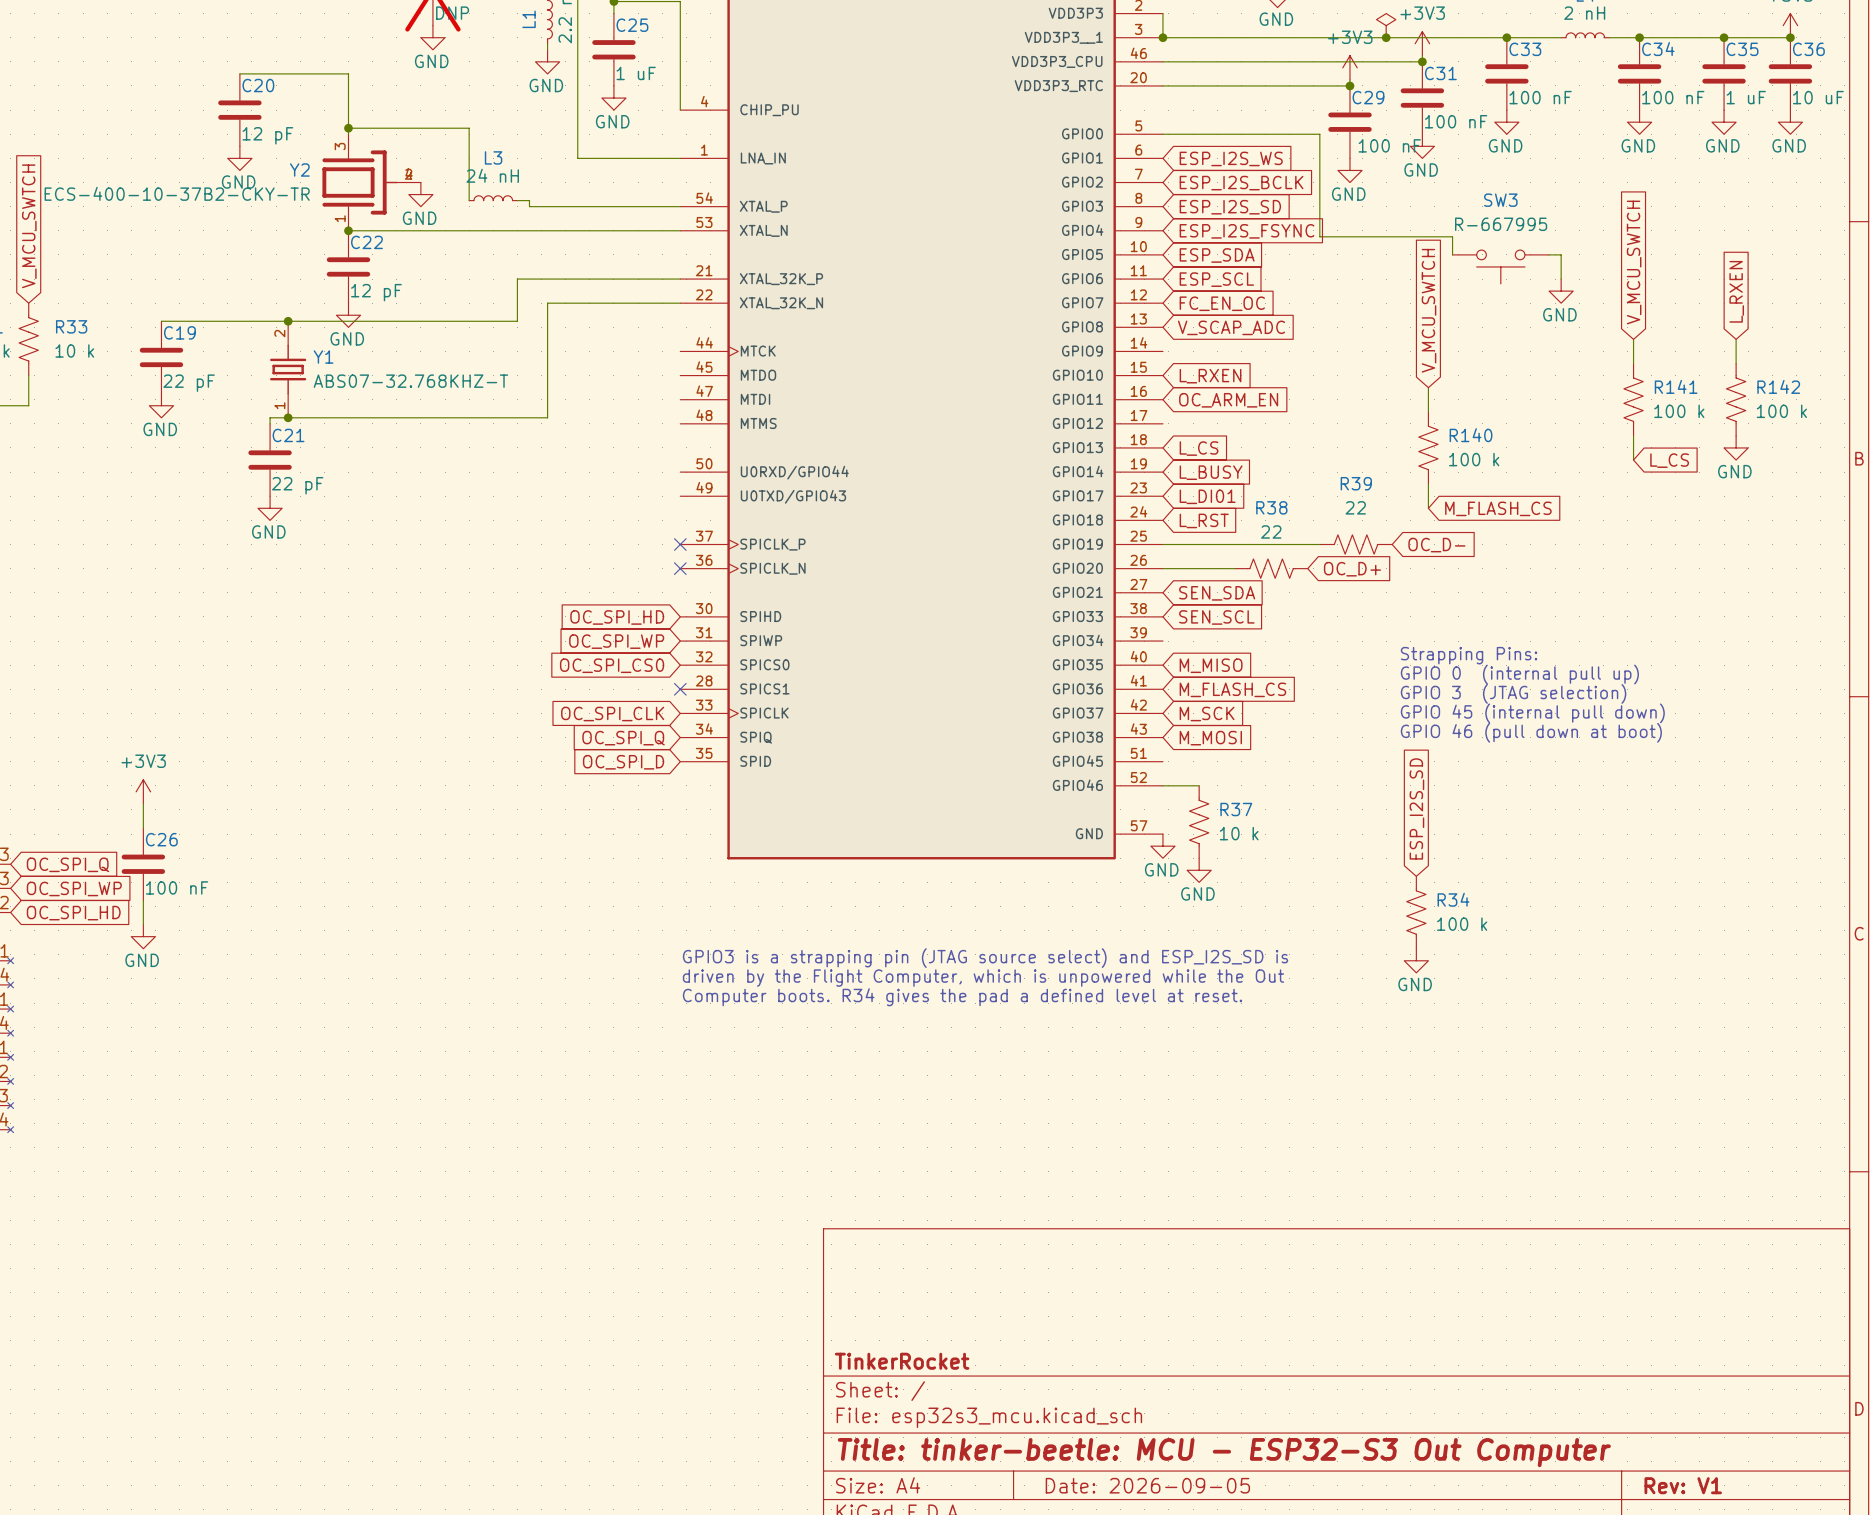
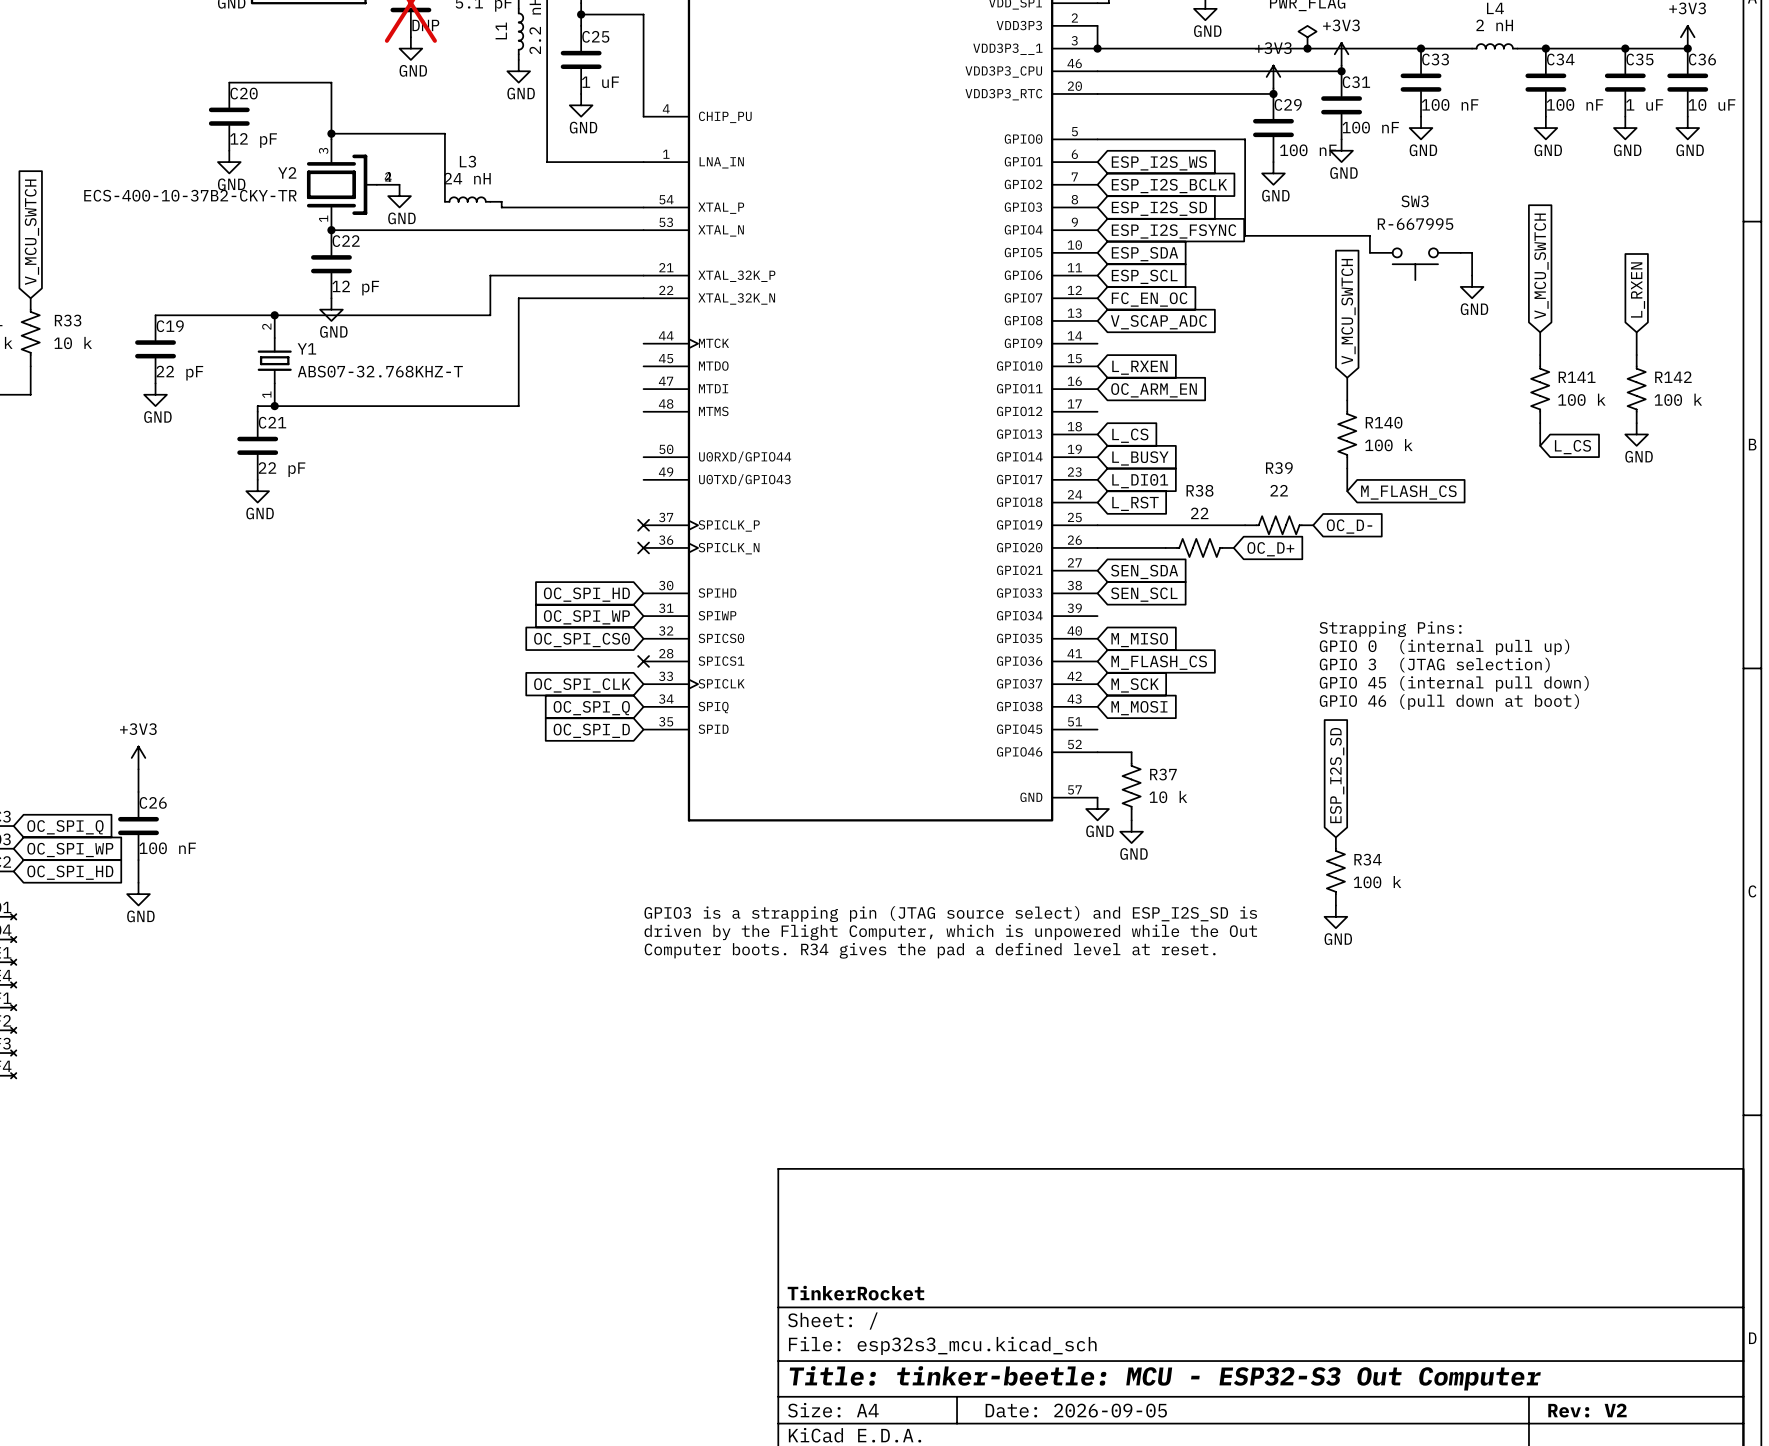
title block: Rev: V1 (1683, 1485) -> Rev: V2 (1587, 1410)

